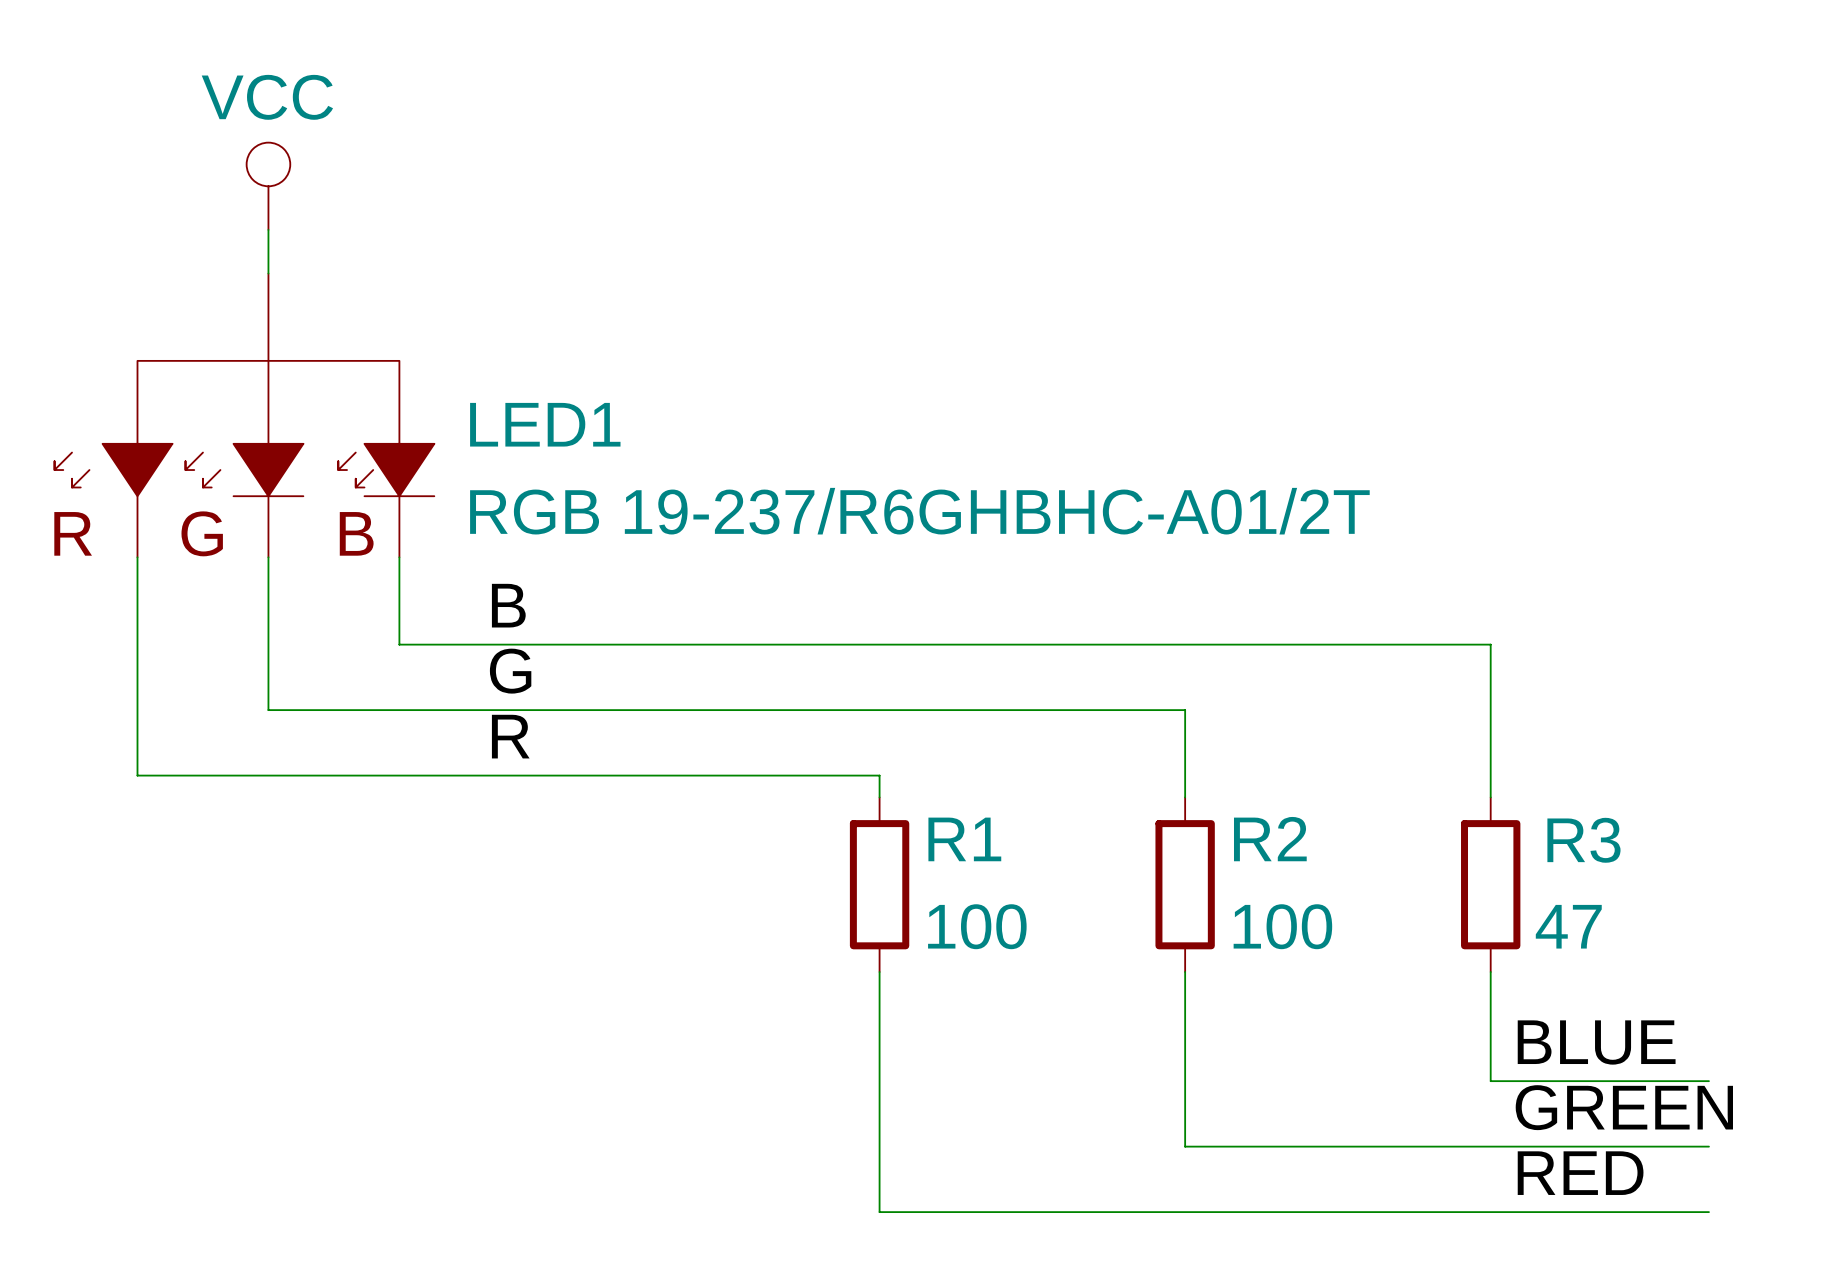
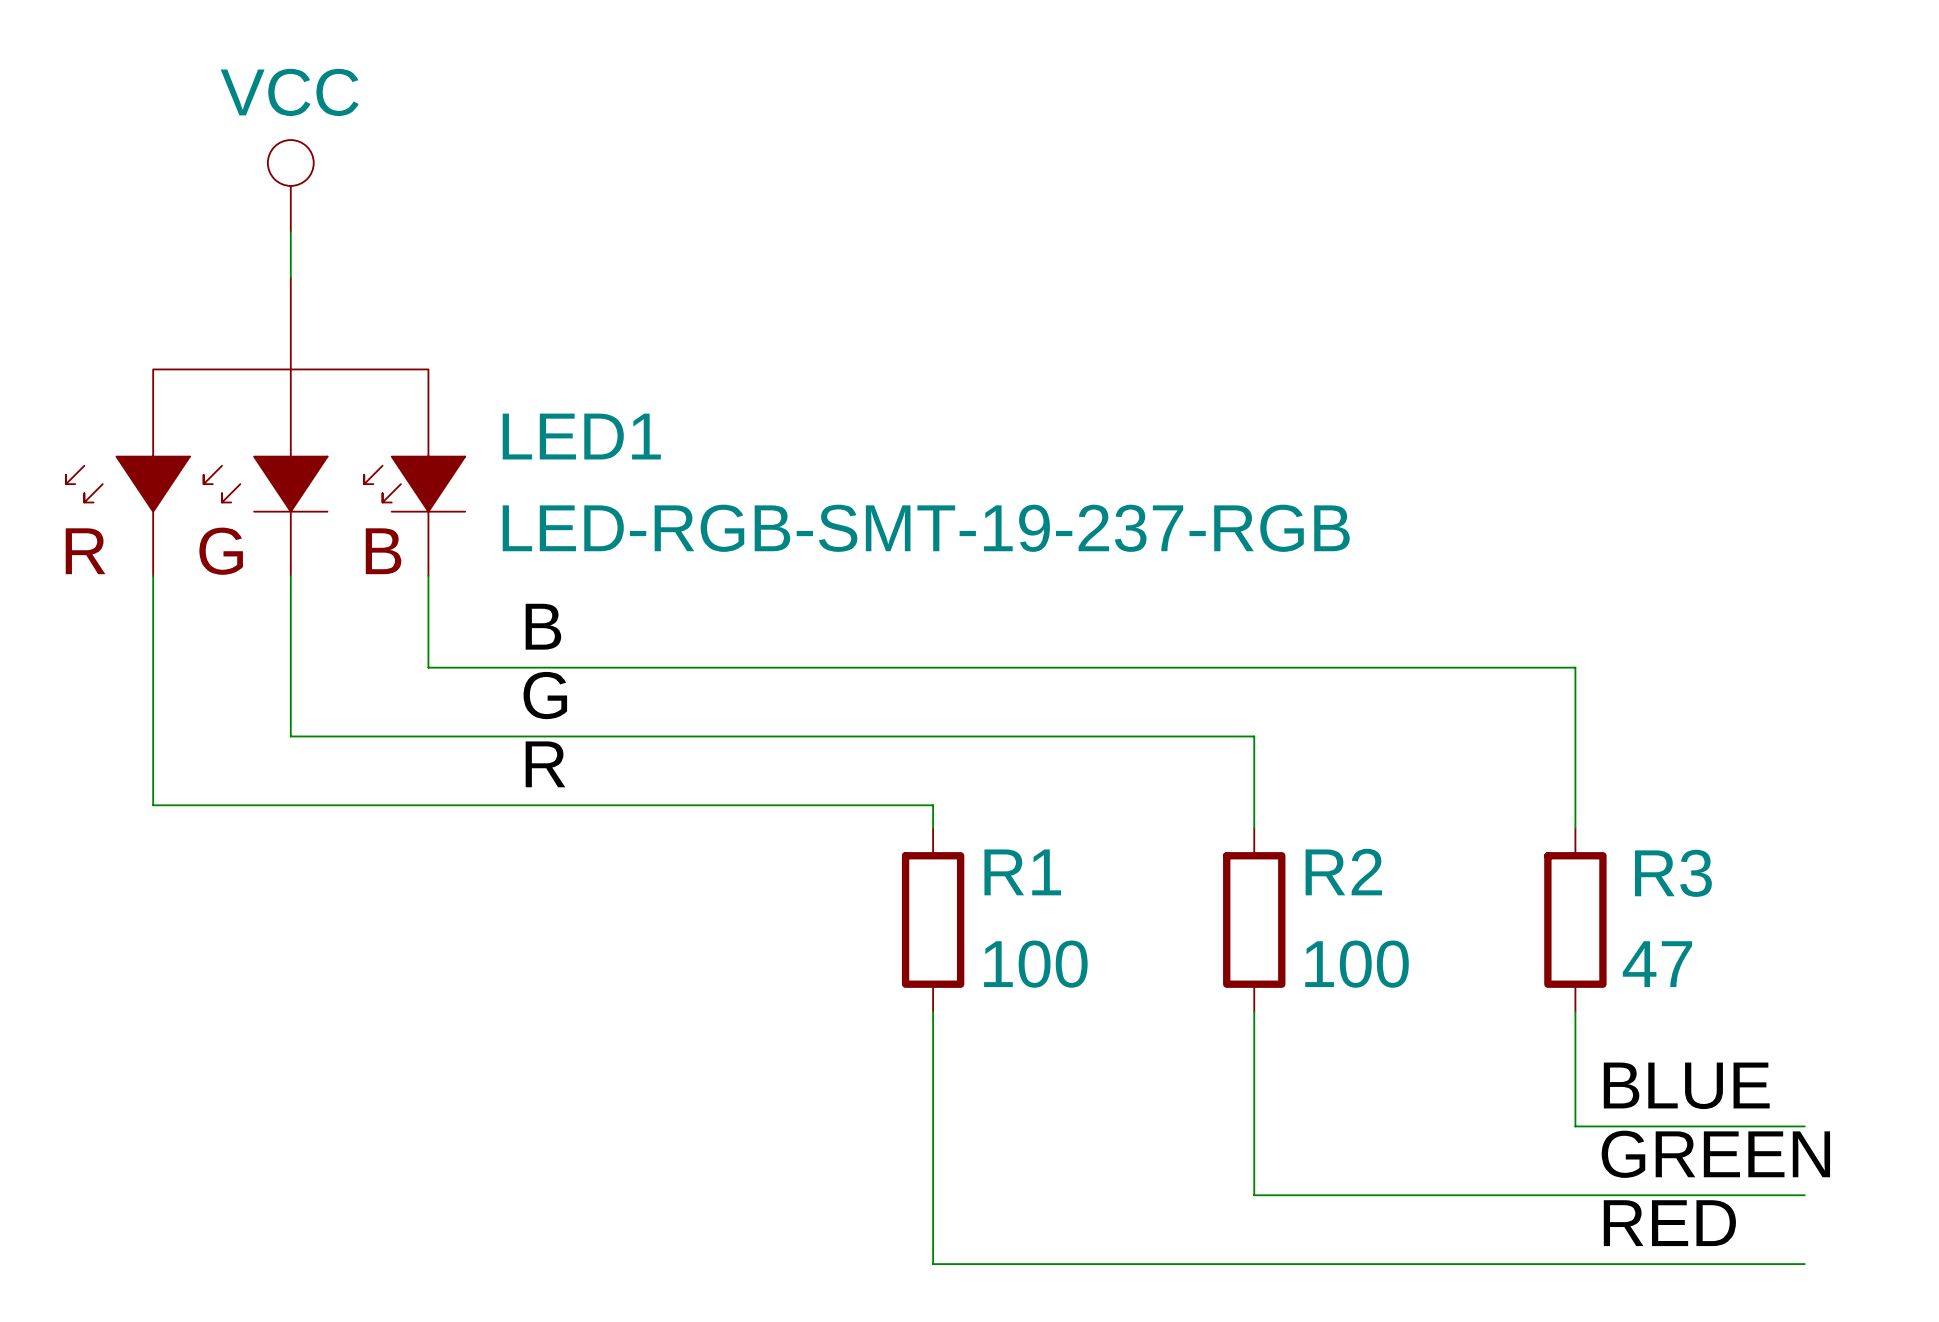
LED1 value: RGB 19-237/R6GHBHC-A01/2T (919, 511) -> LED-RGB-SMT-19-237-RGB (926, 528)

